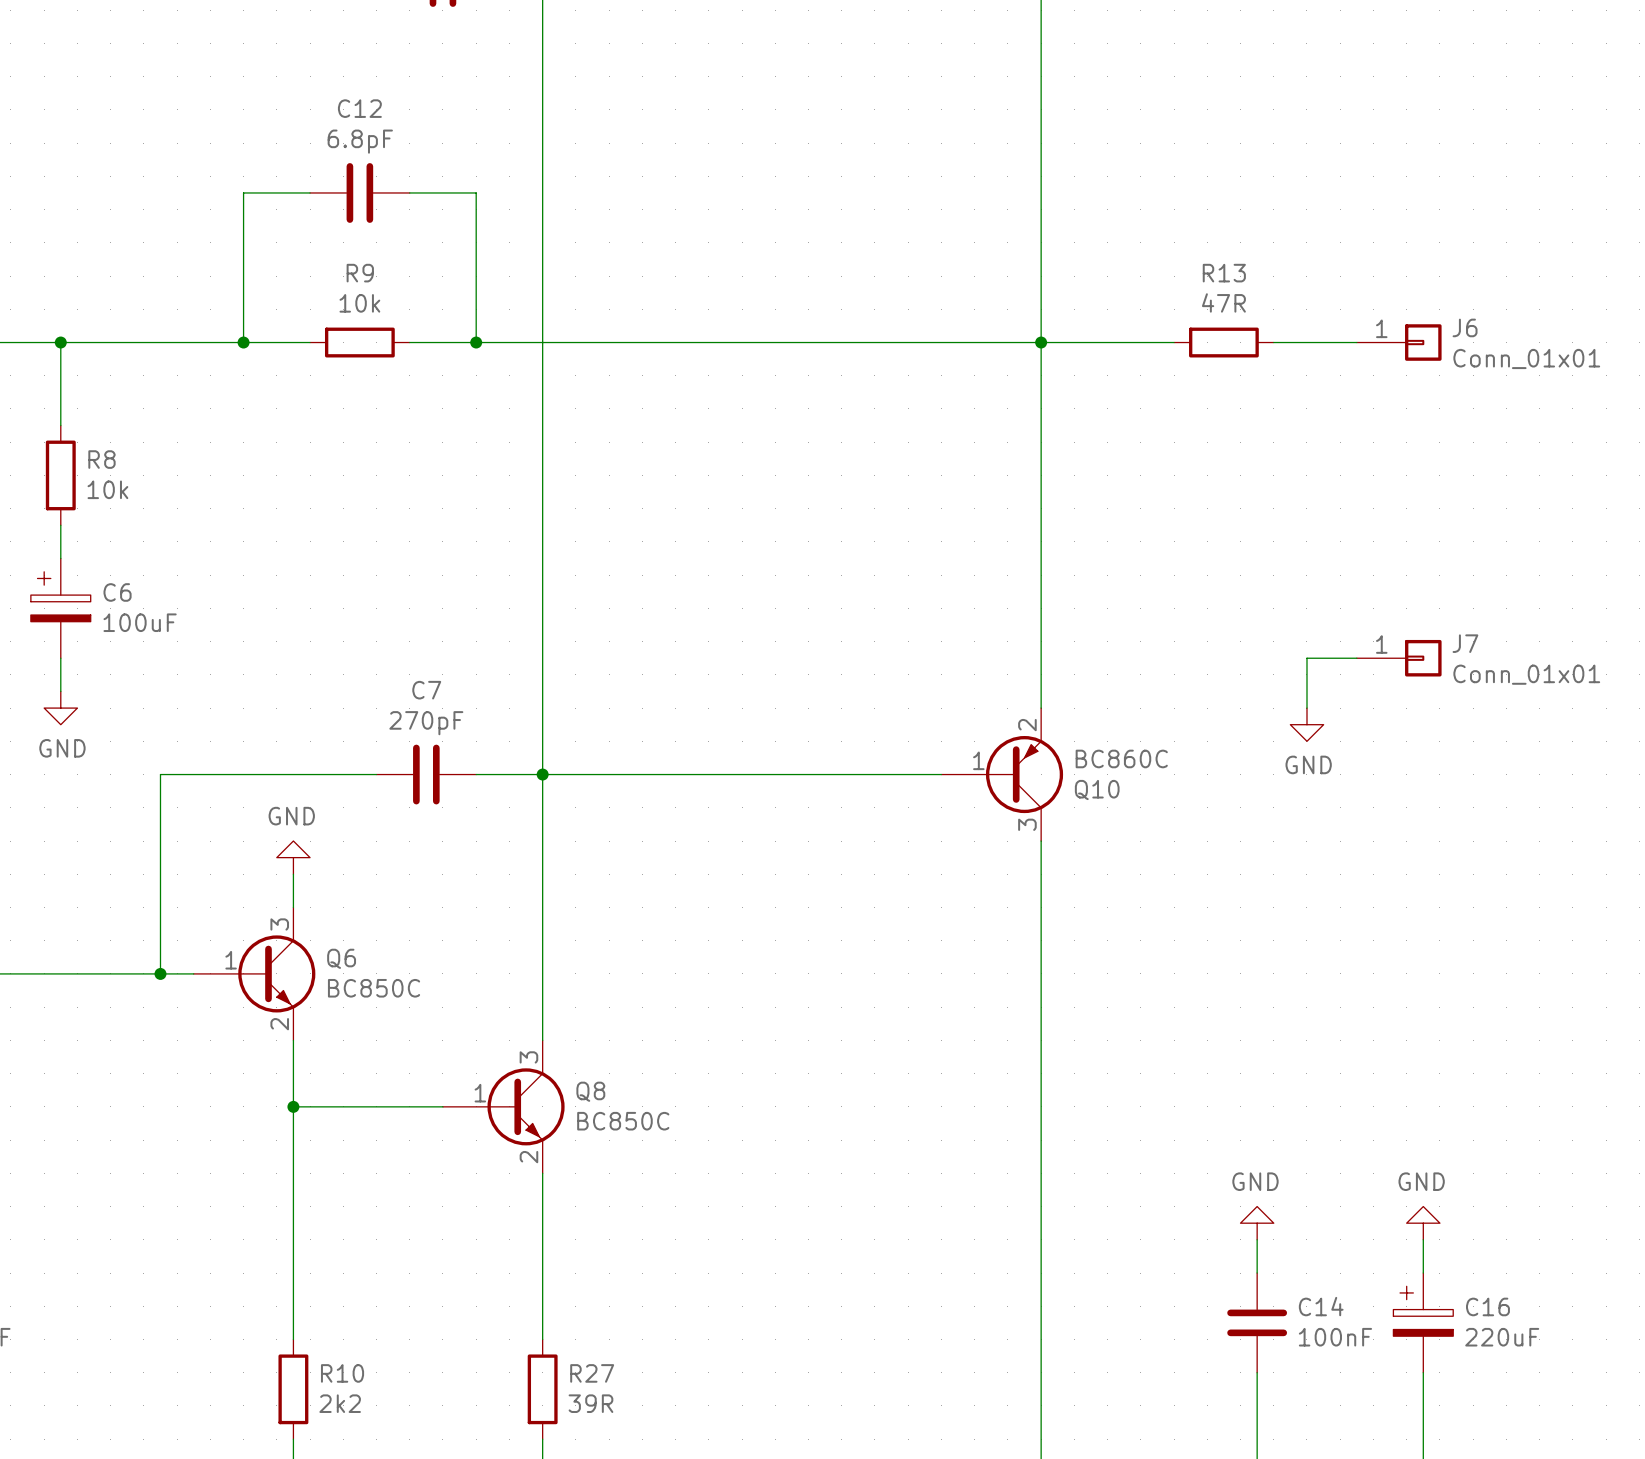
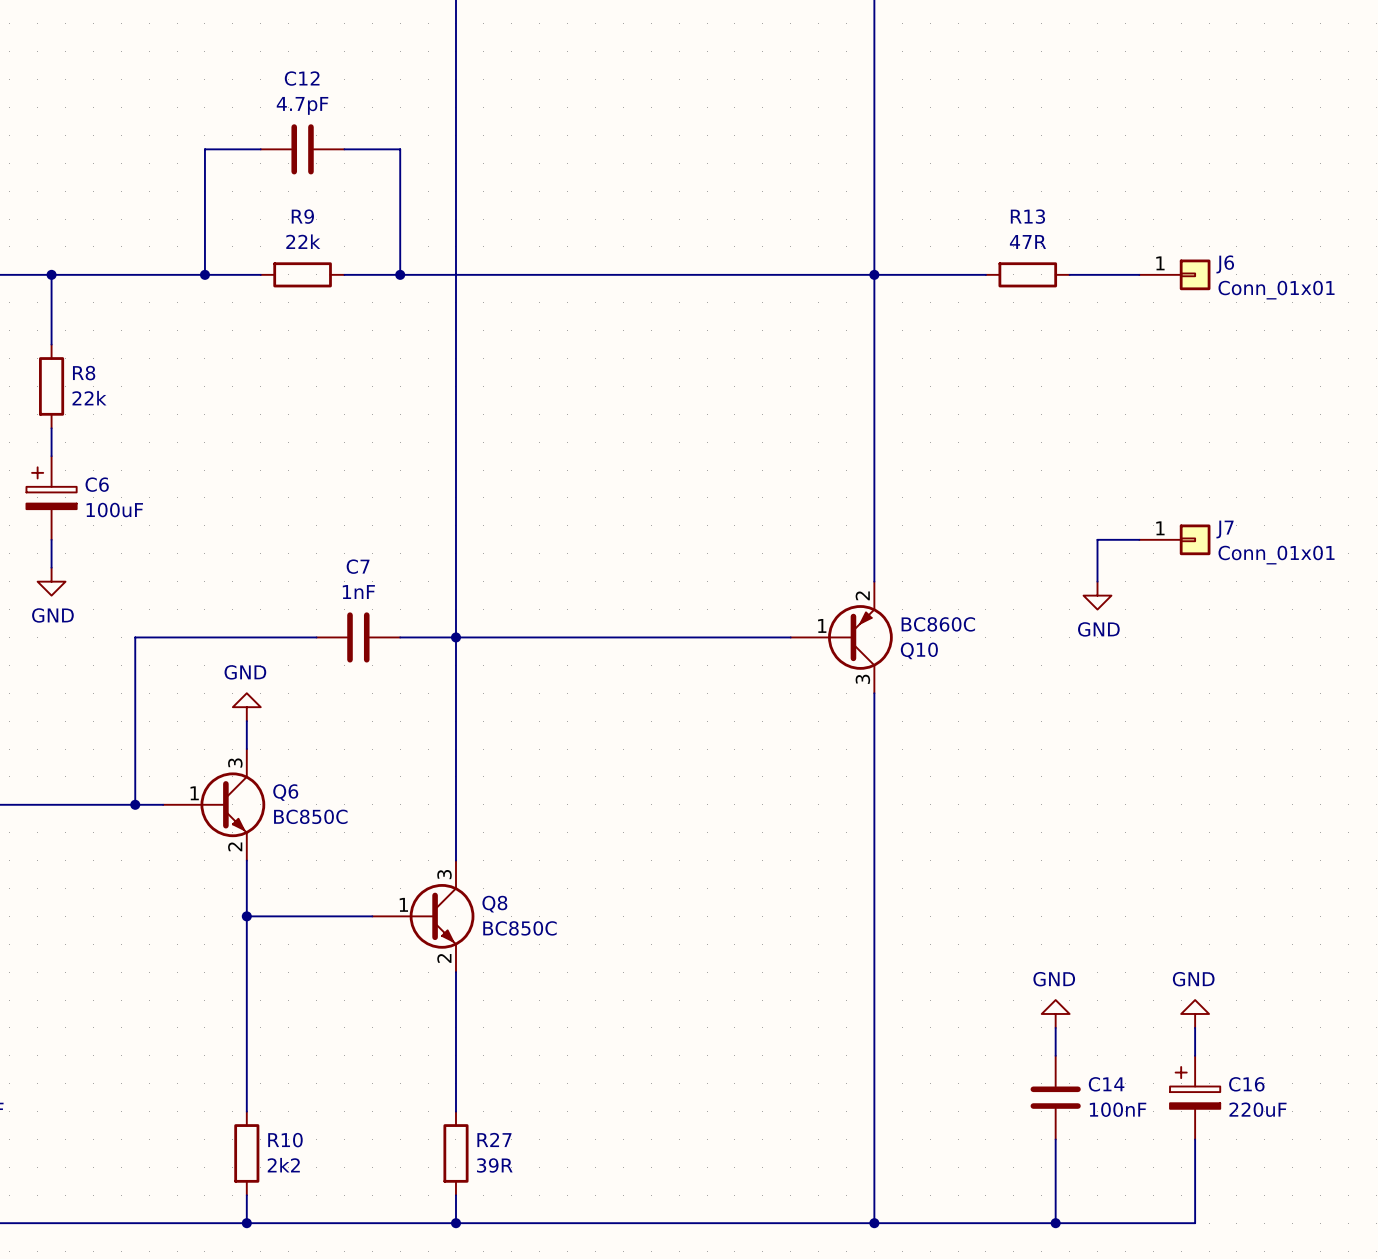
C12 value: 6.8pF (360, 141) -> 4.7pF (302, 105)
R9 value: 10k (359, 303) -> 22k (303, 241)
R8 value: 10k (107, 489) -> 22k (89, 398)
C7 value: 270pF (426, 723) -> 1nF (358, 592)

